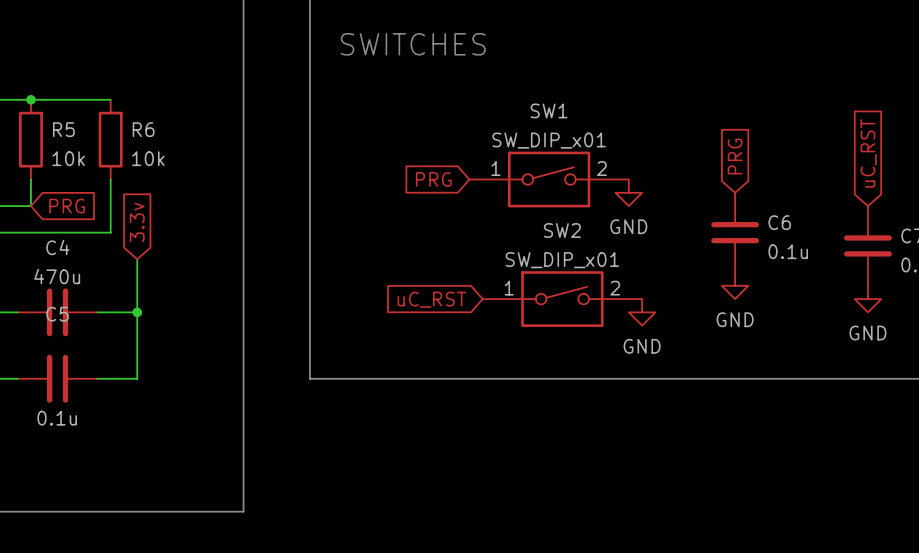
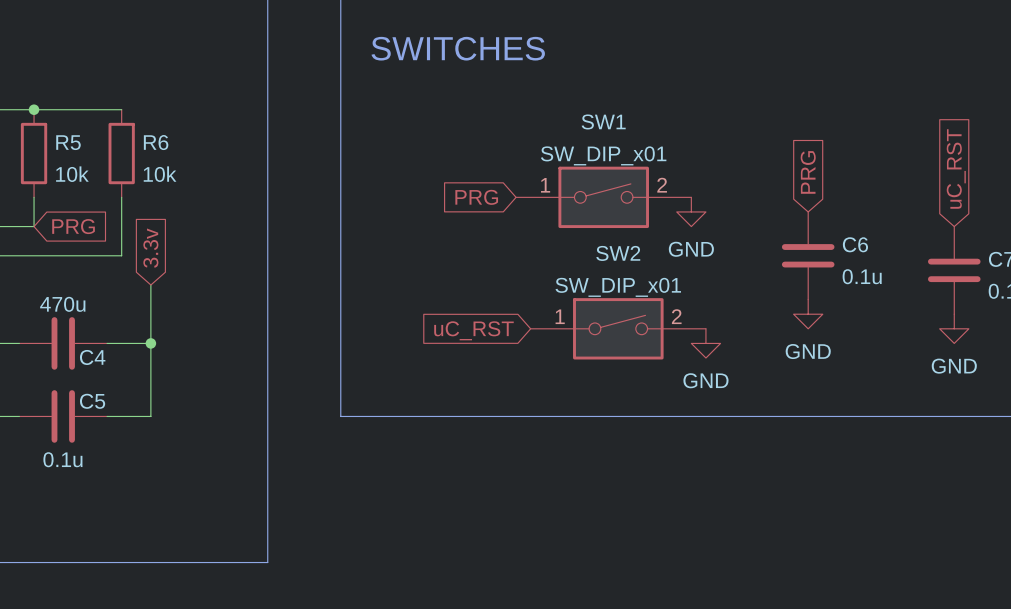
C4 name position: C4 (57, 247) -> C4 (92, 357)
C5 name position: C5 (57, 314) -> C5 (92, 401)

